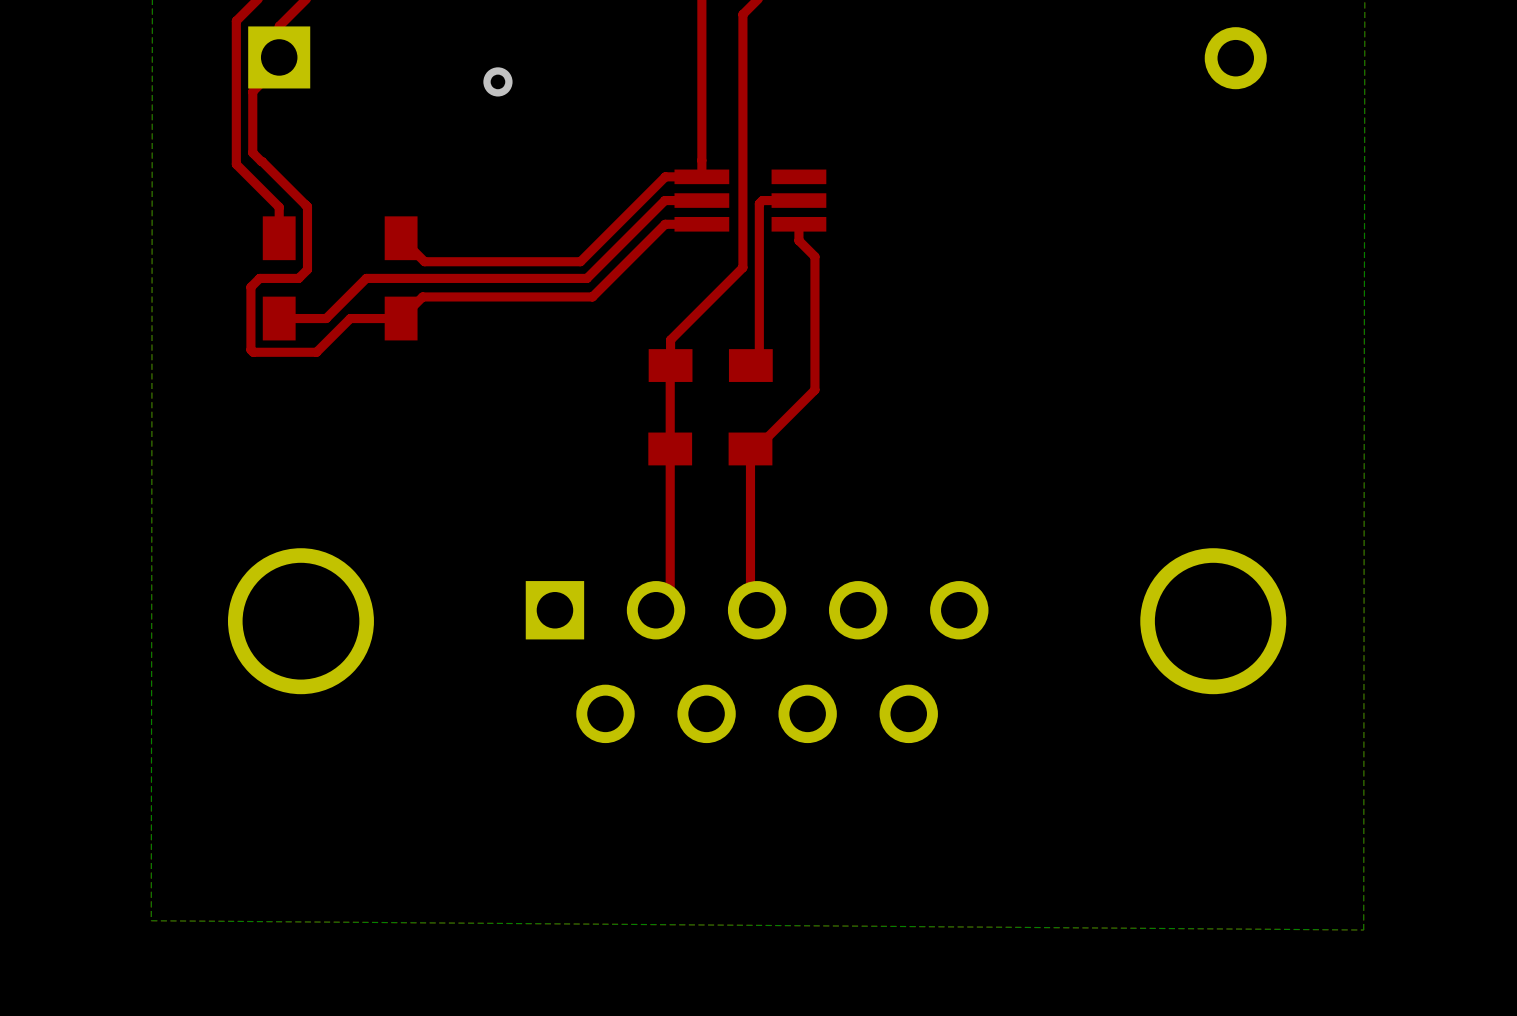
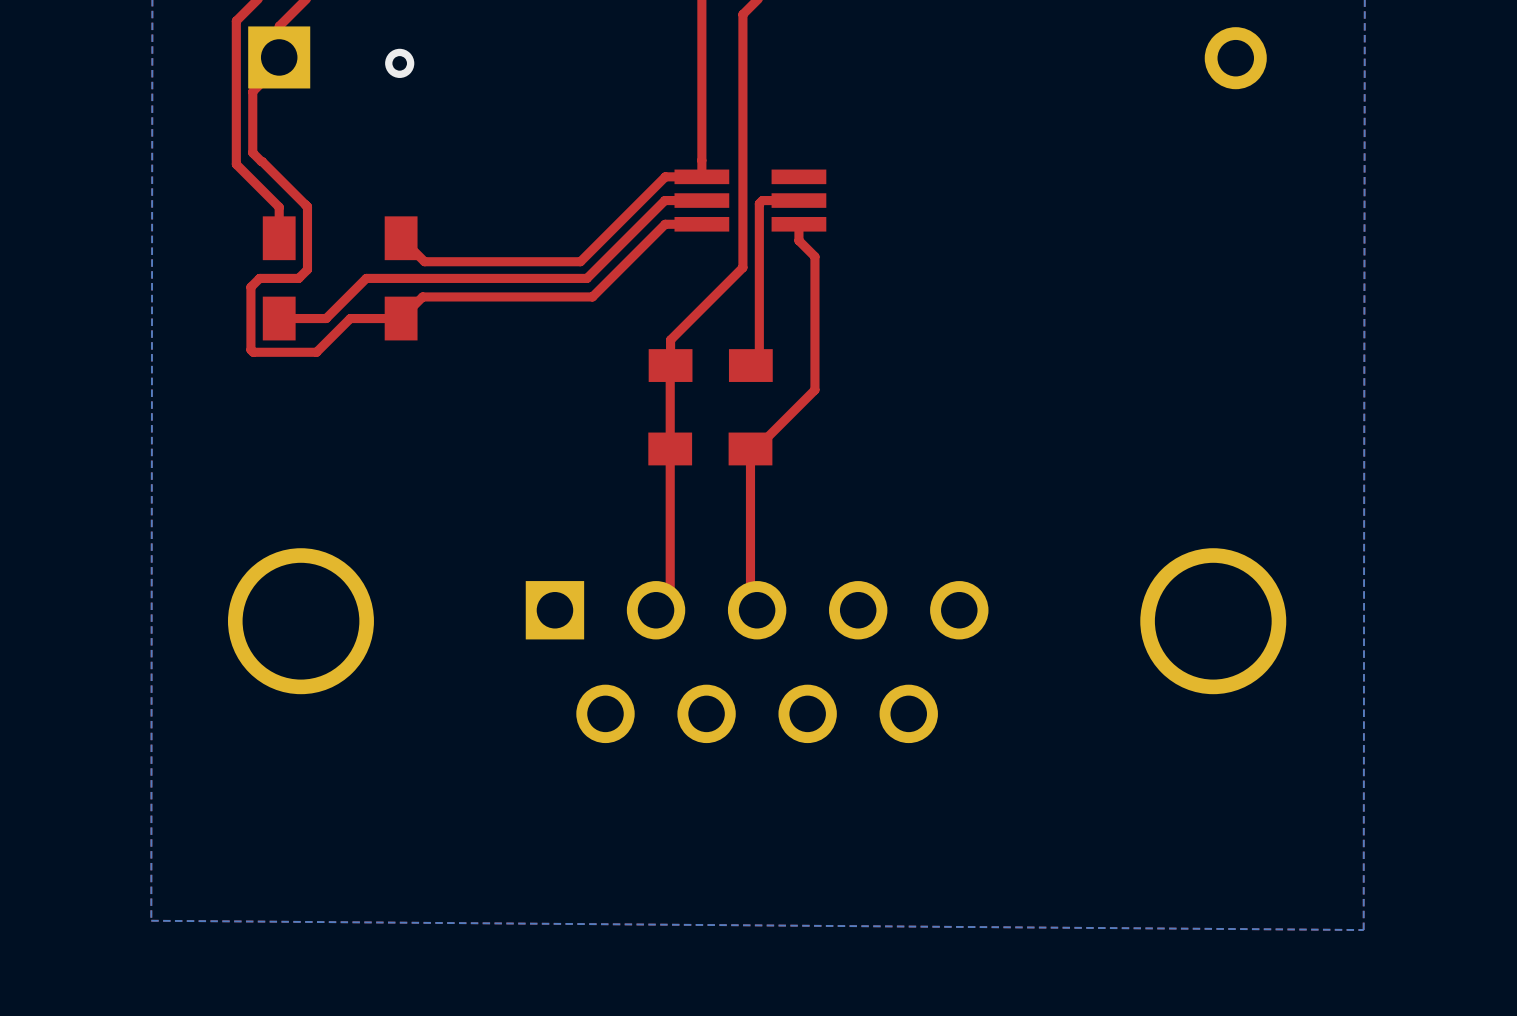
via position: (497, 81) -> (399, 63)

